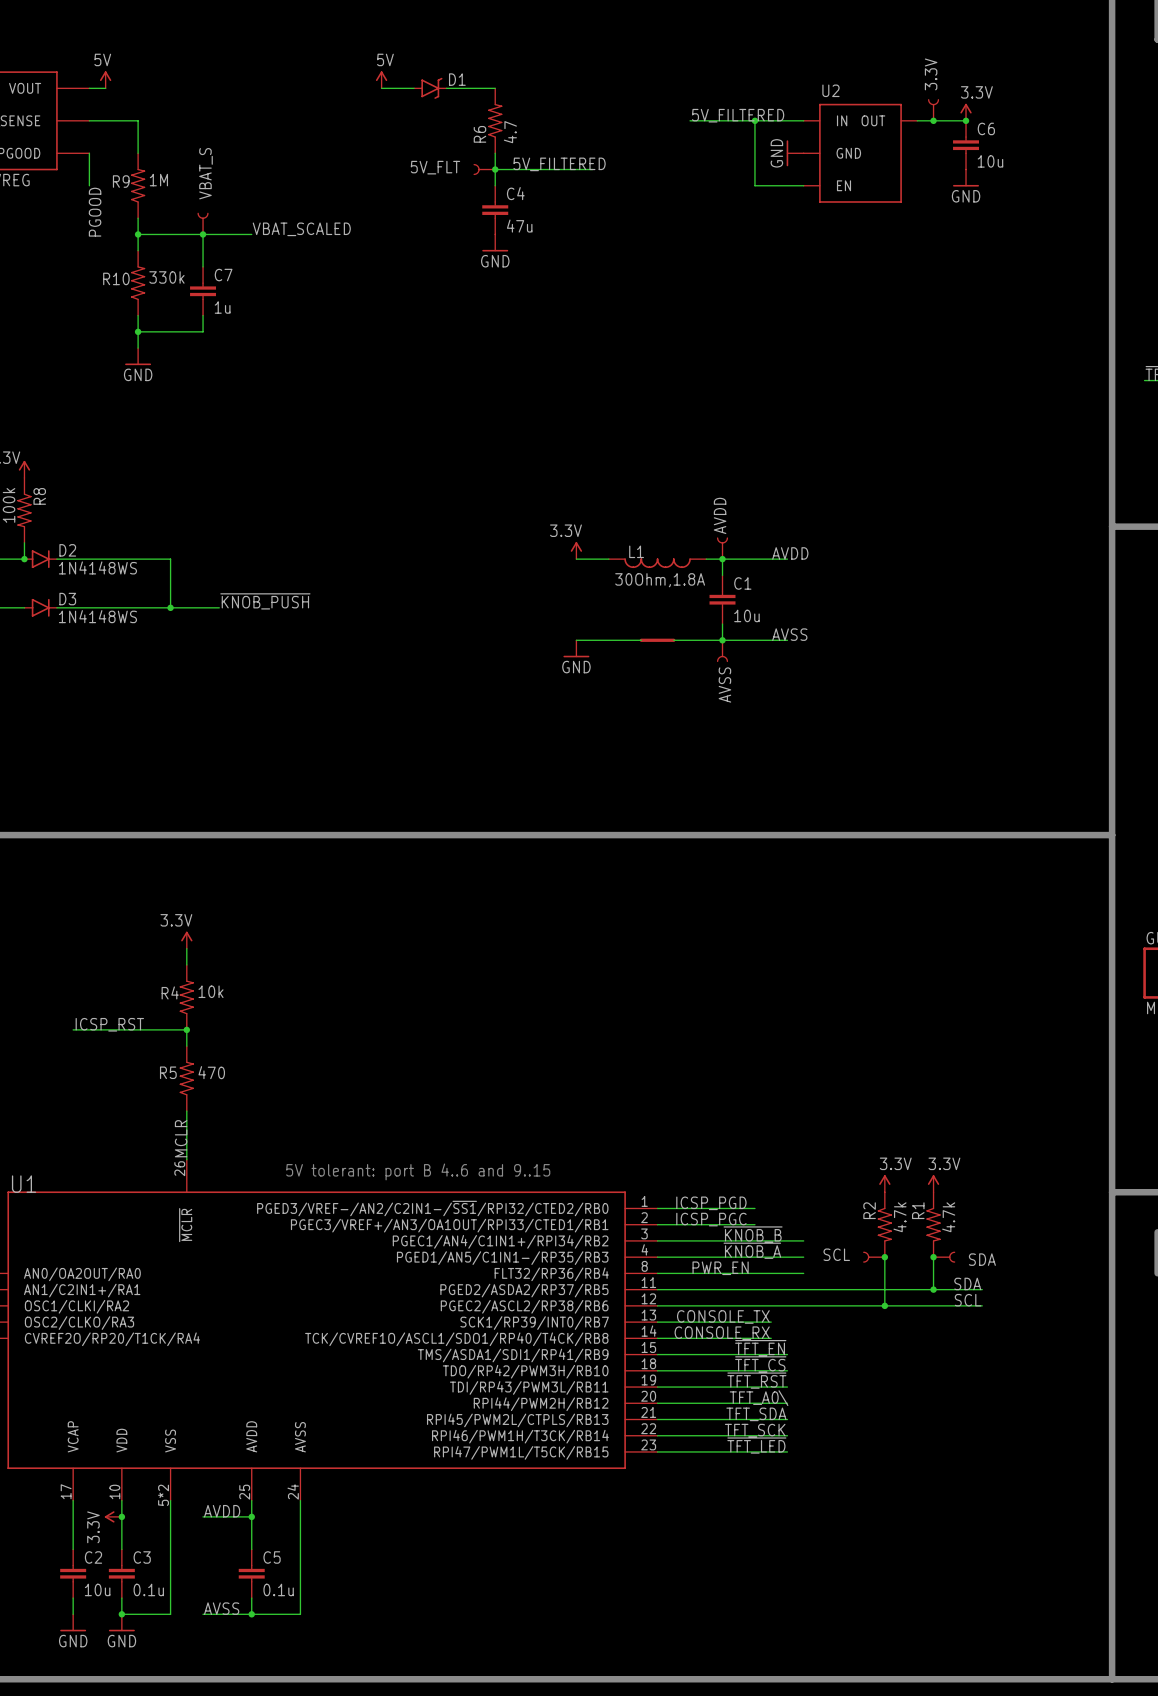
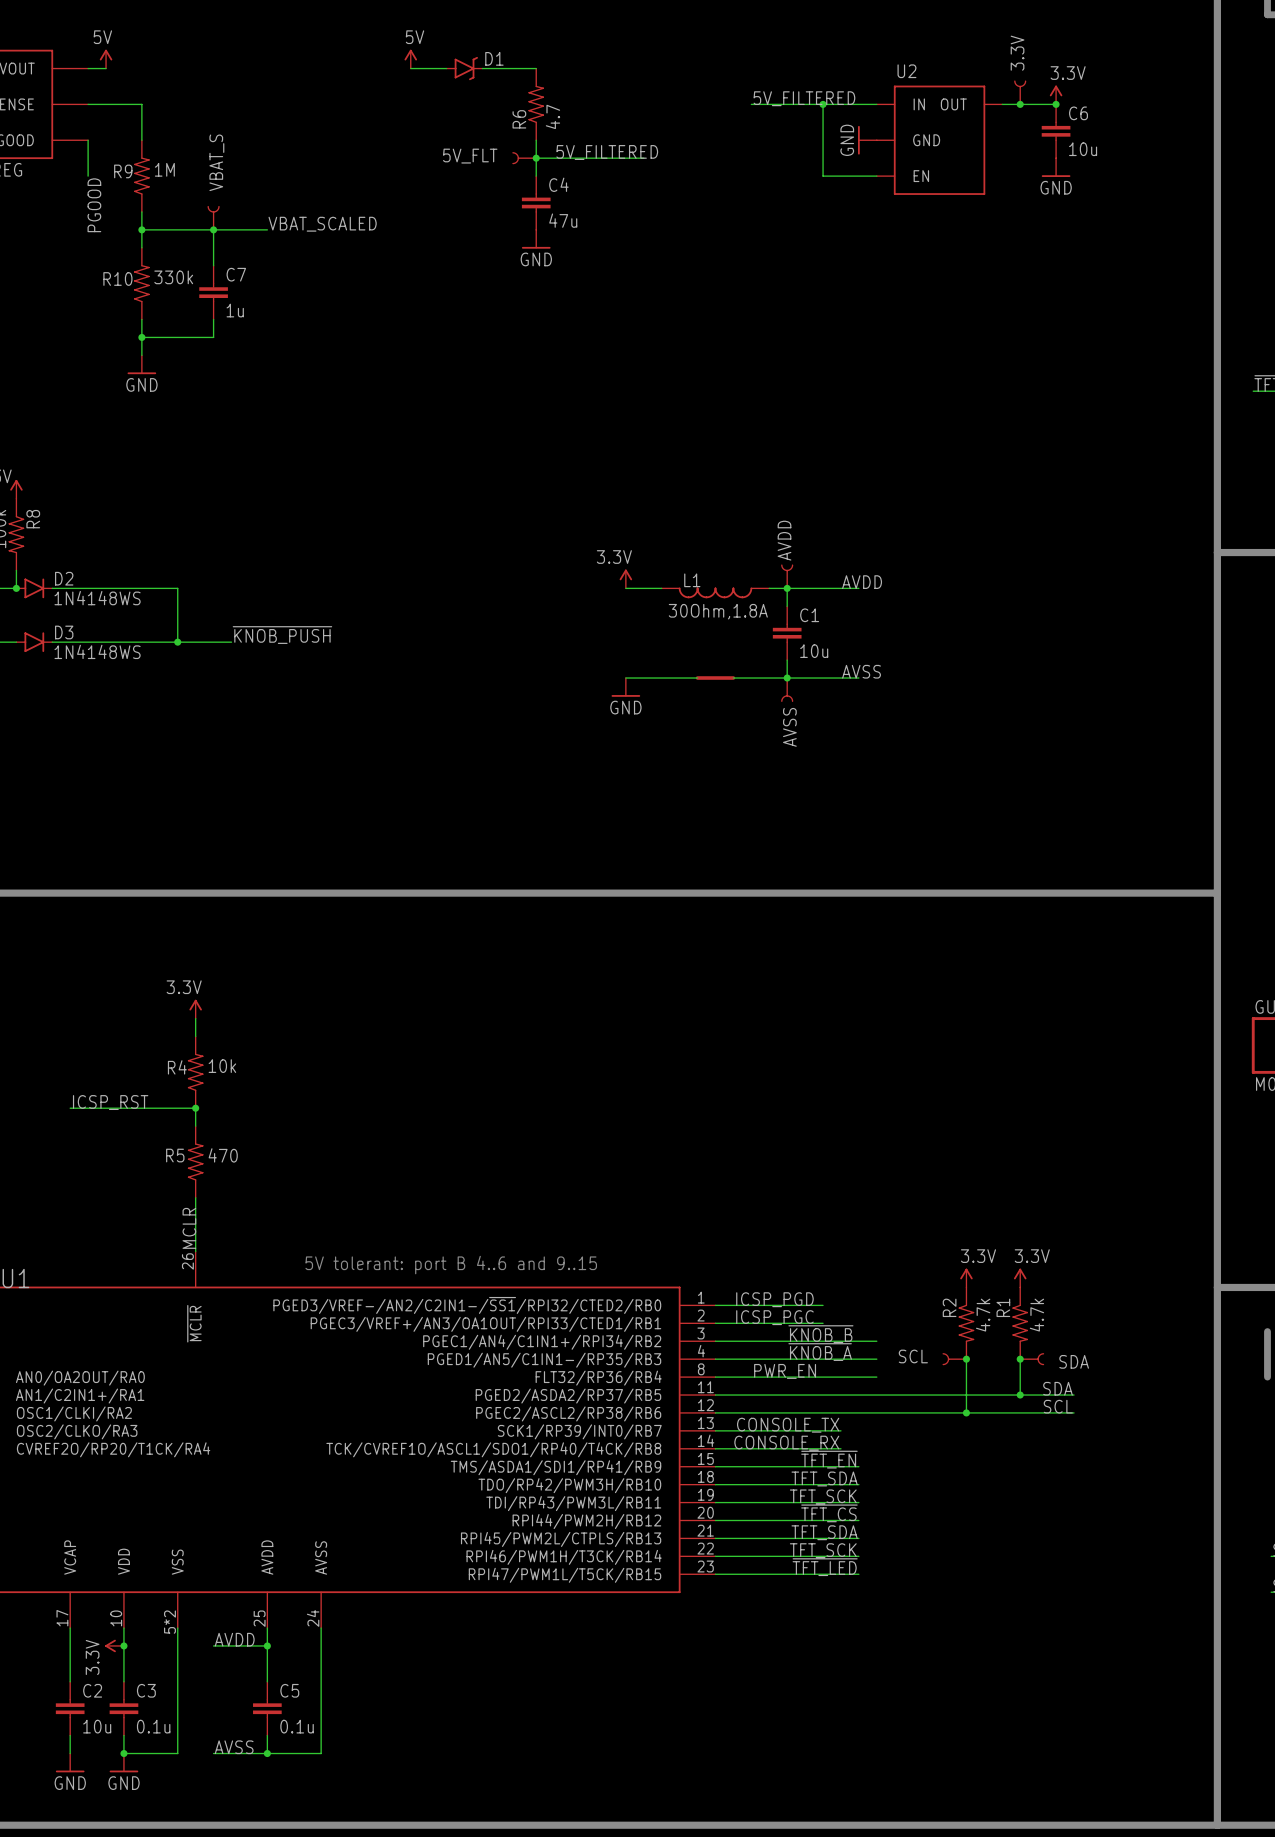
label: ~{TFT_CS} (760, 1364) -> TFT_SDA (824, 1478)
label: ~{TFT_RST} (756, 1380) -> TFT_SCK (823, 1496)
label: TFT_A0\ (759, 1398) -> ~{TFT_CS} (829, 1513)

